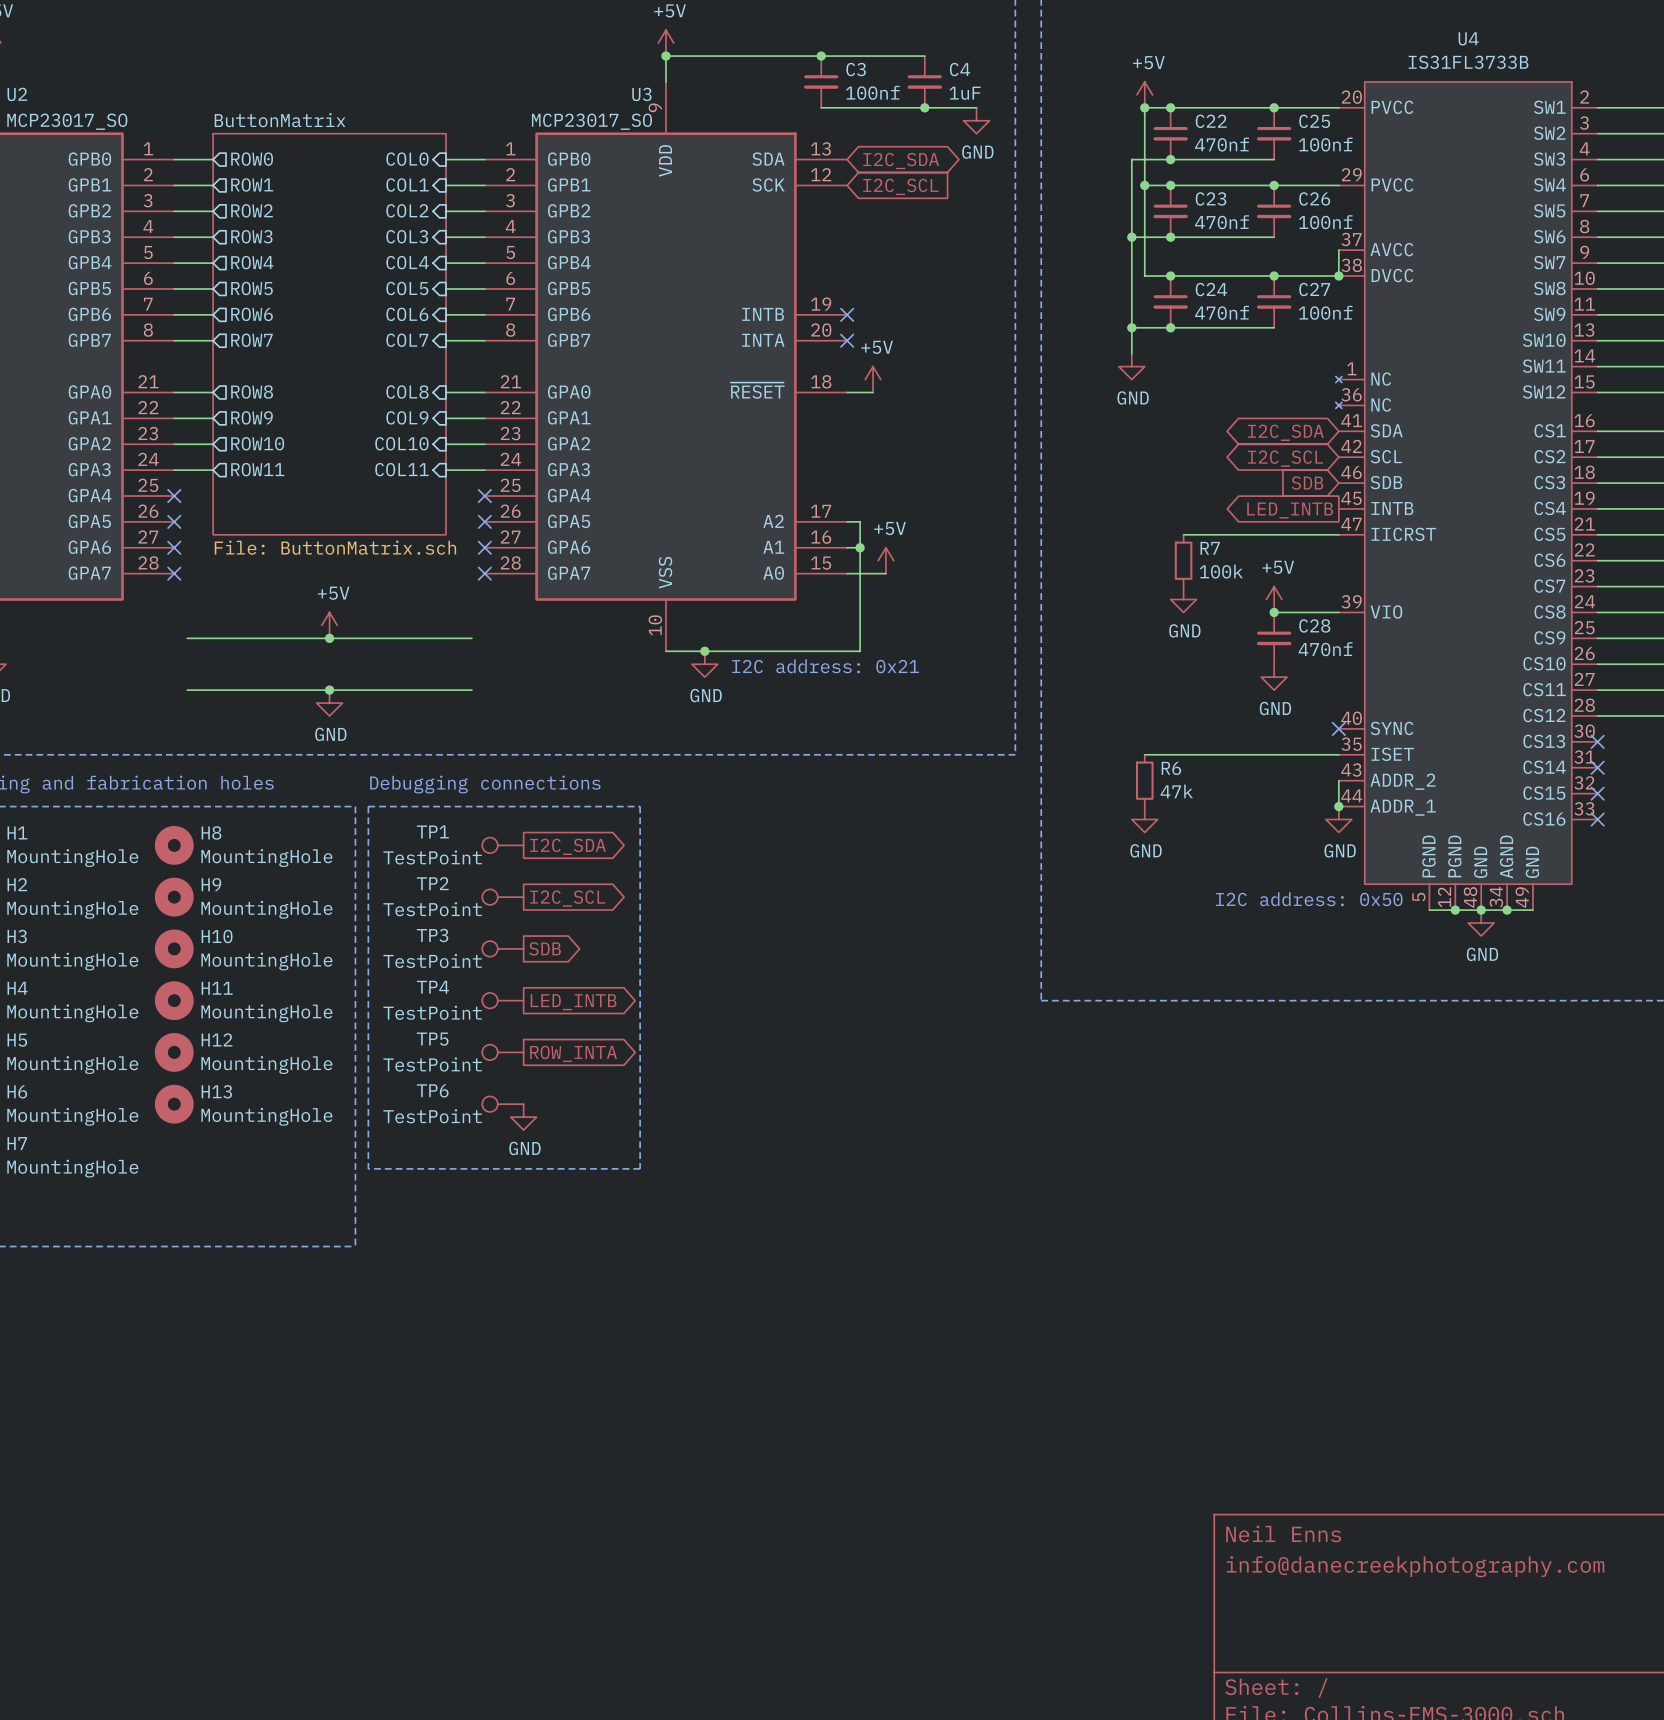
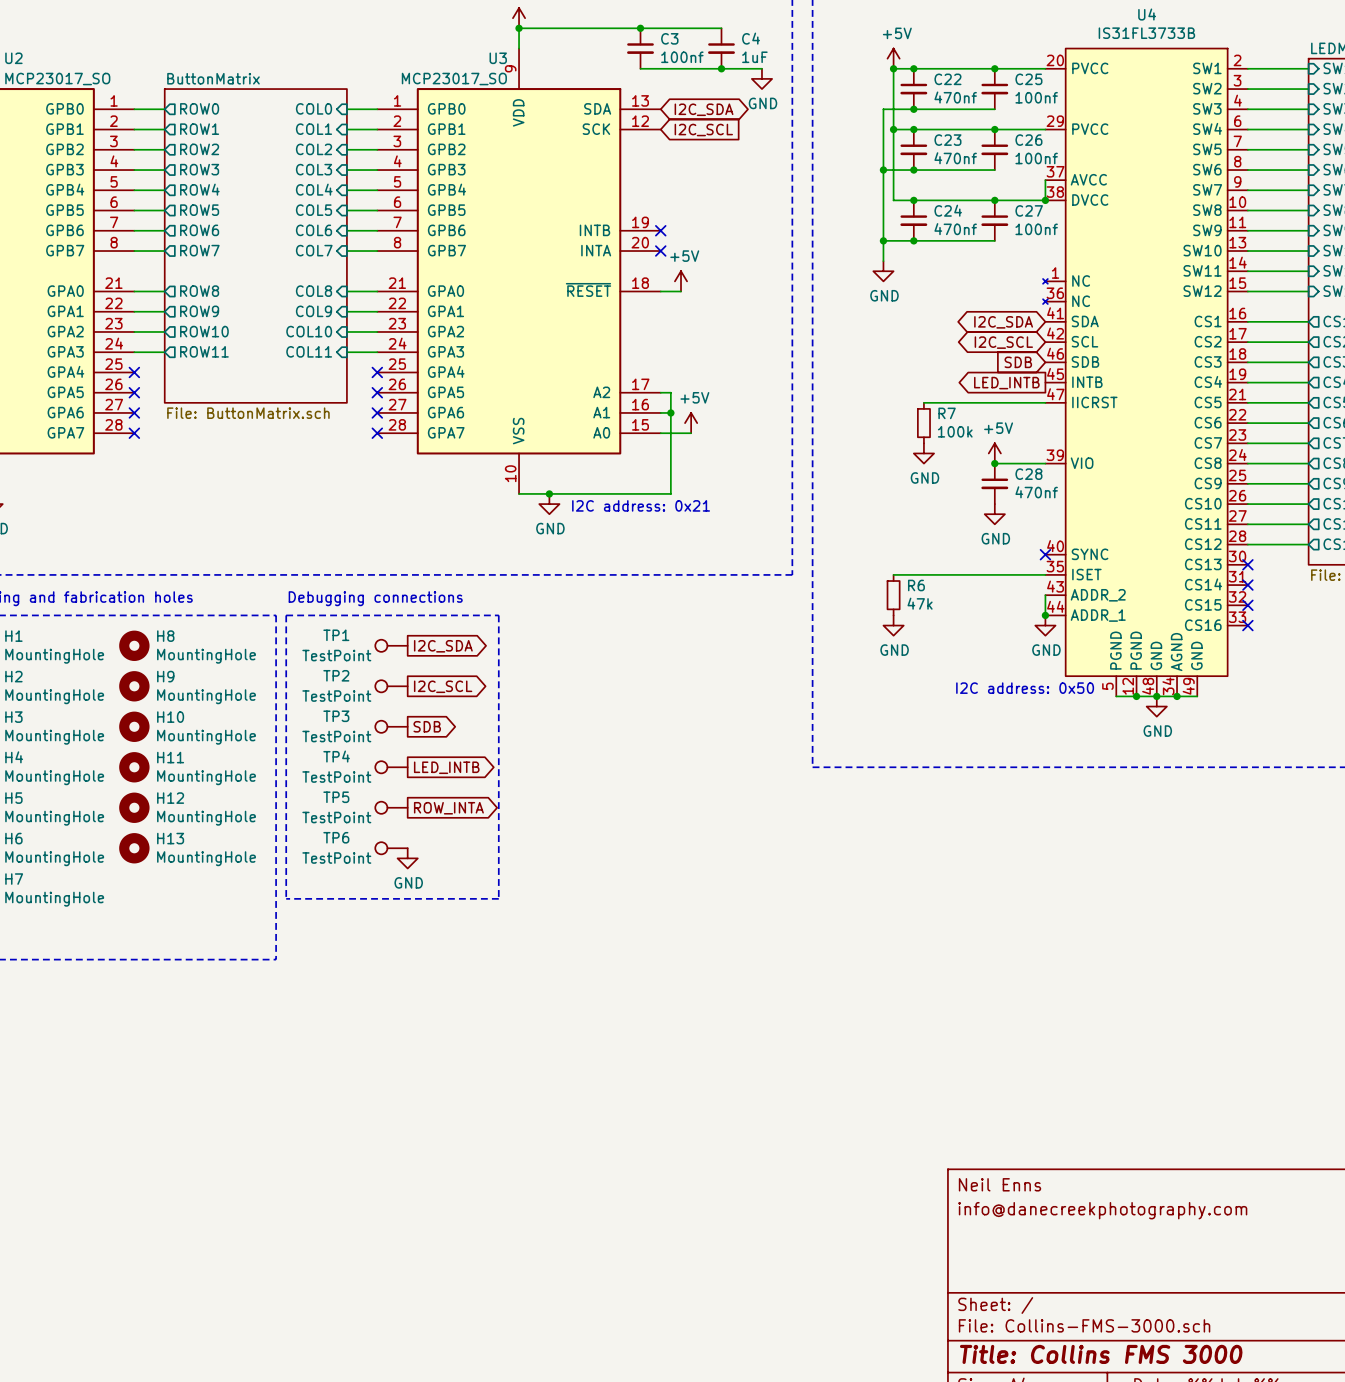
power symbol: +5V (329, 625) -> none
wire: (187, 638) (471, 638) -> none
junction: (329, 638) -> none
wire: (187, 690) (471, 690) -> none
junction: (329, 690) -> none
power symbol: GND (329, 703) -> none

